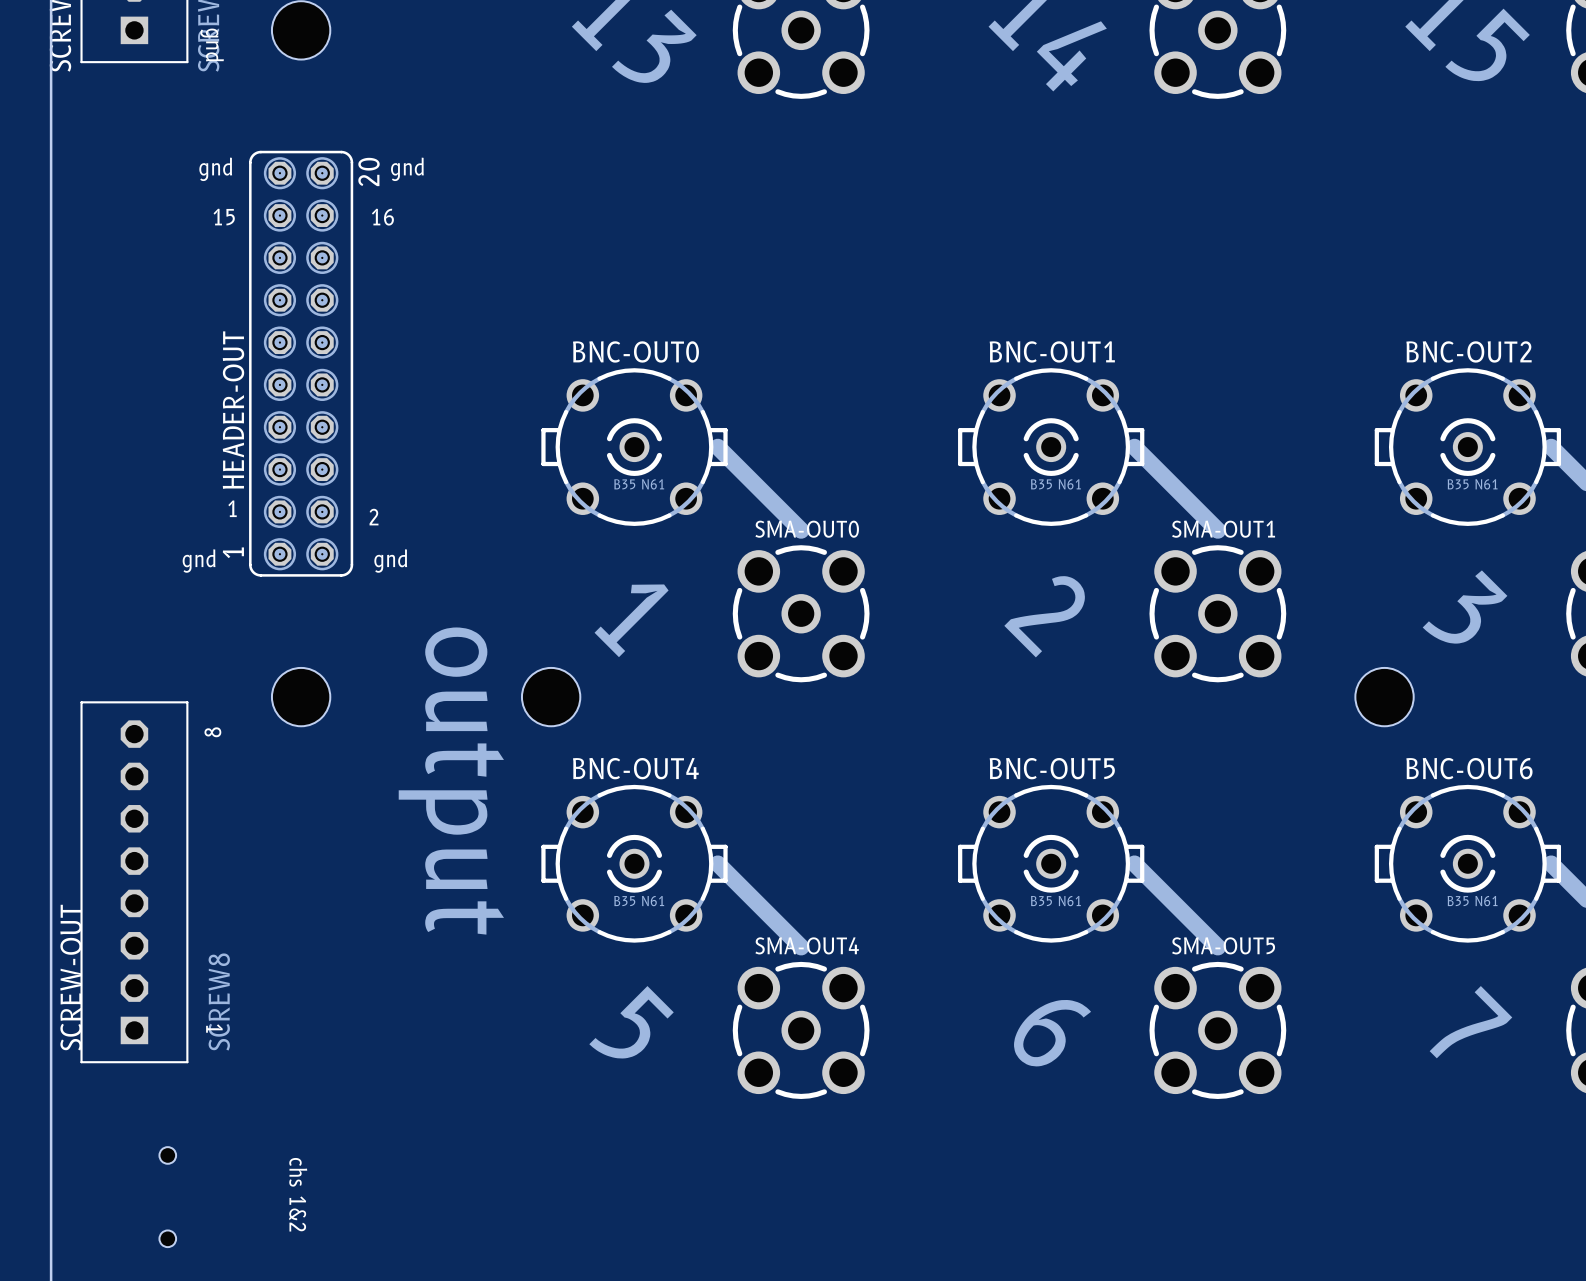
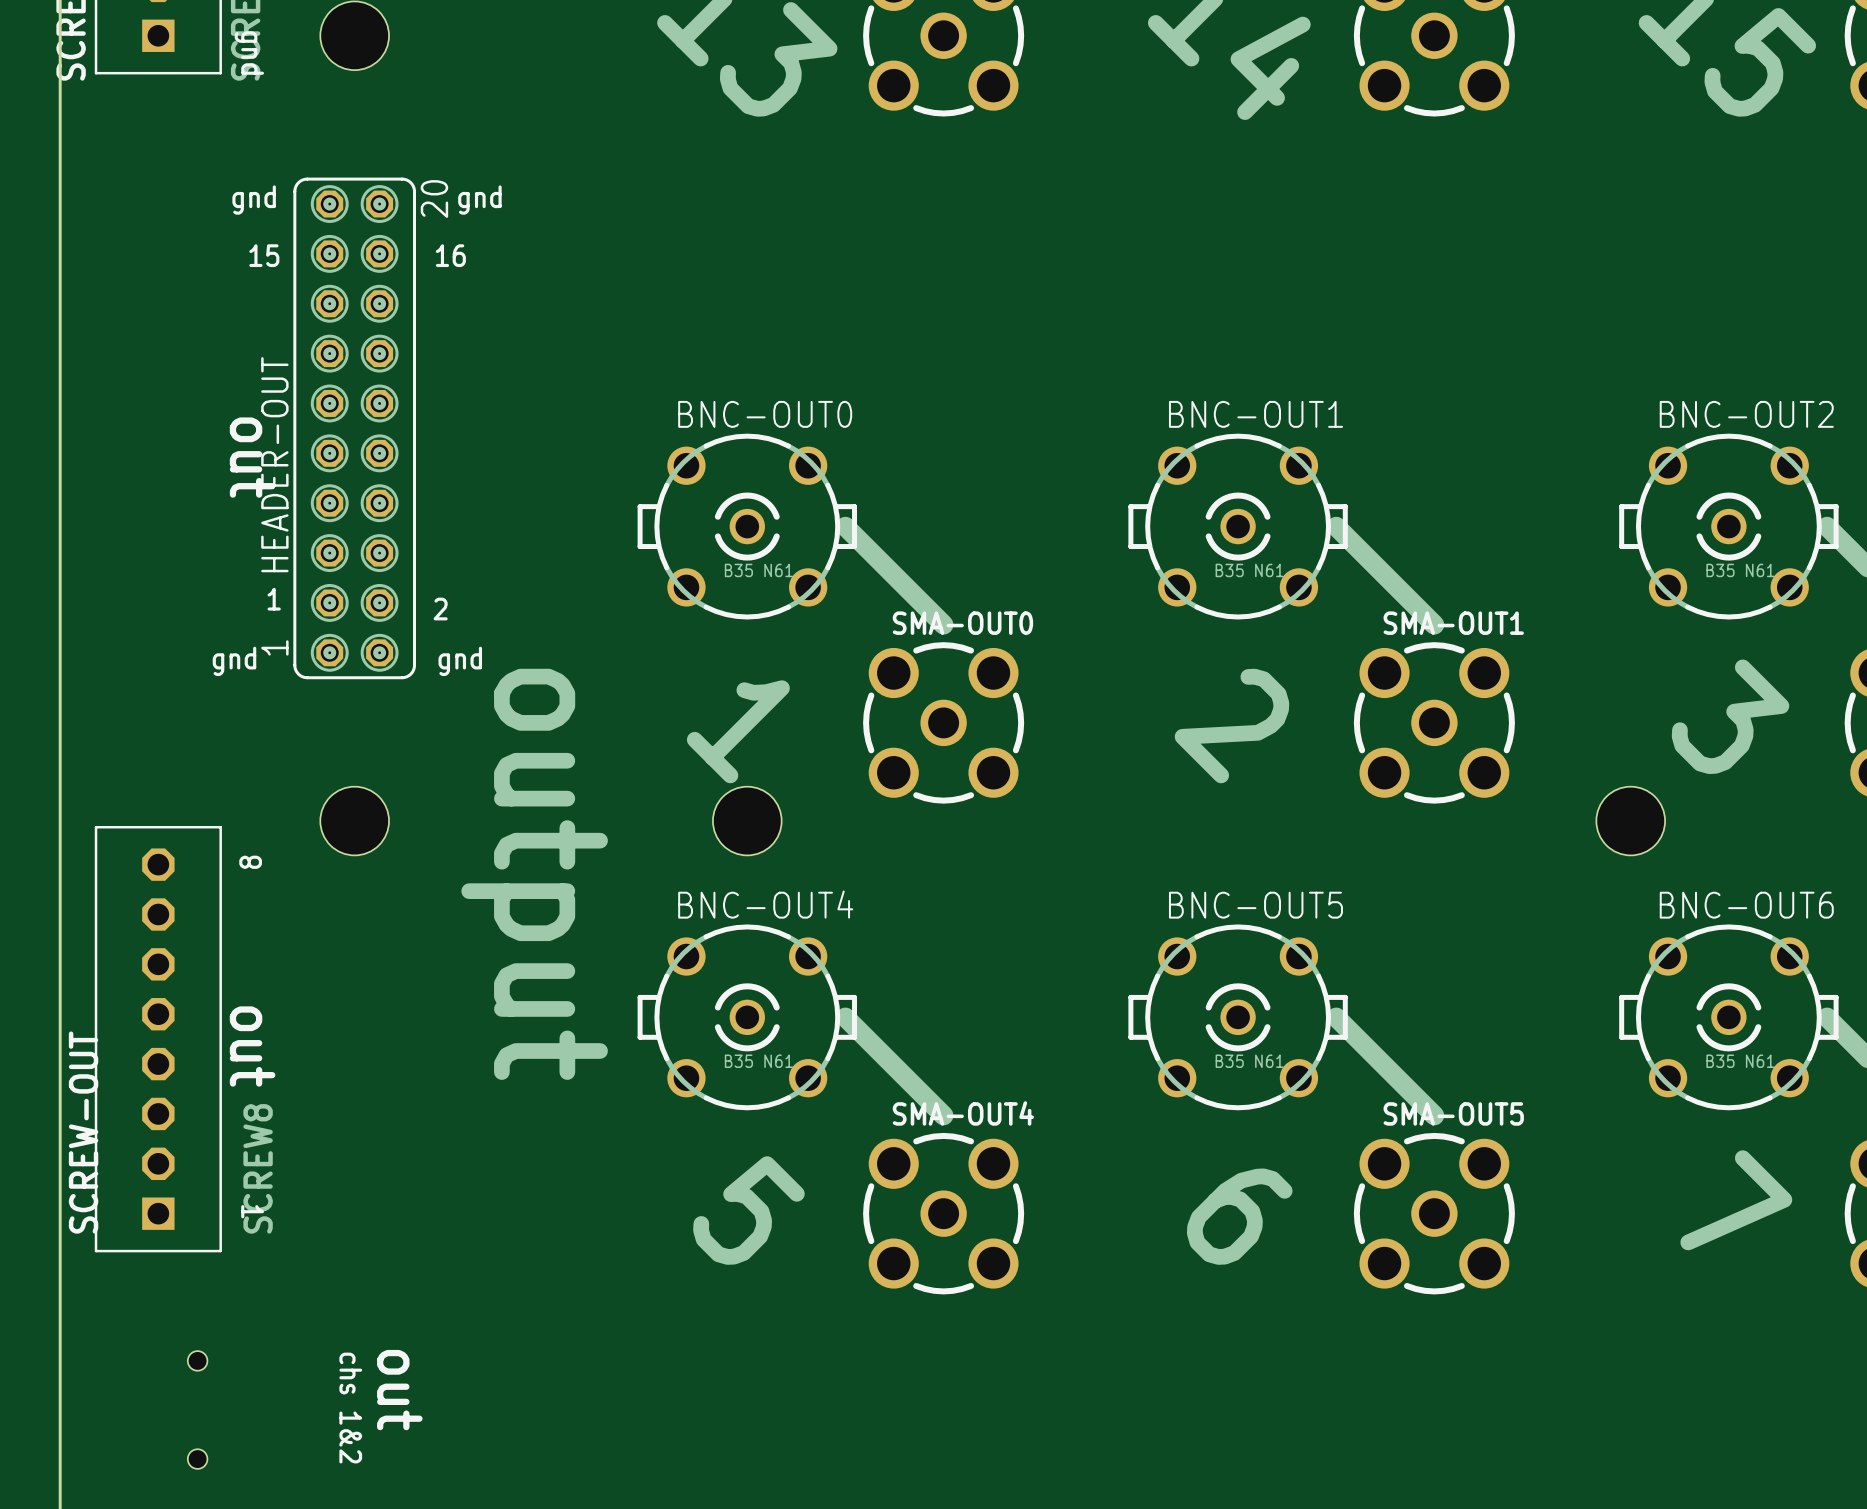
text: none -> out (252, 457)
hole position: (551, 697) -> (747, 821)
text position: output (451, 781) -> output (534, 874)
text: none -> out (252, 1046)
text: none -> out (399, 1390)

